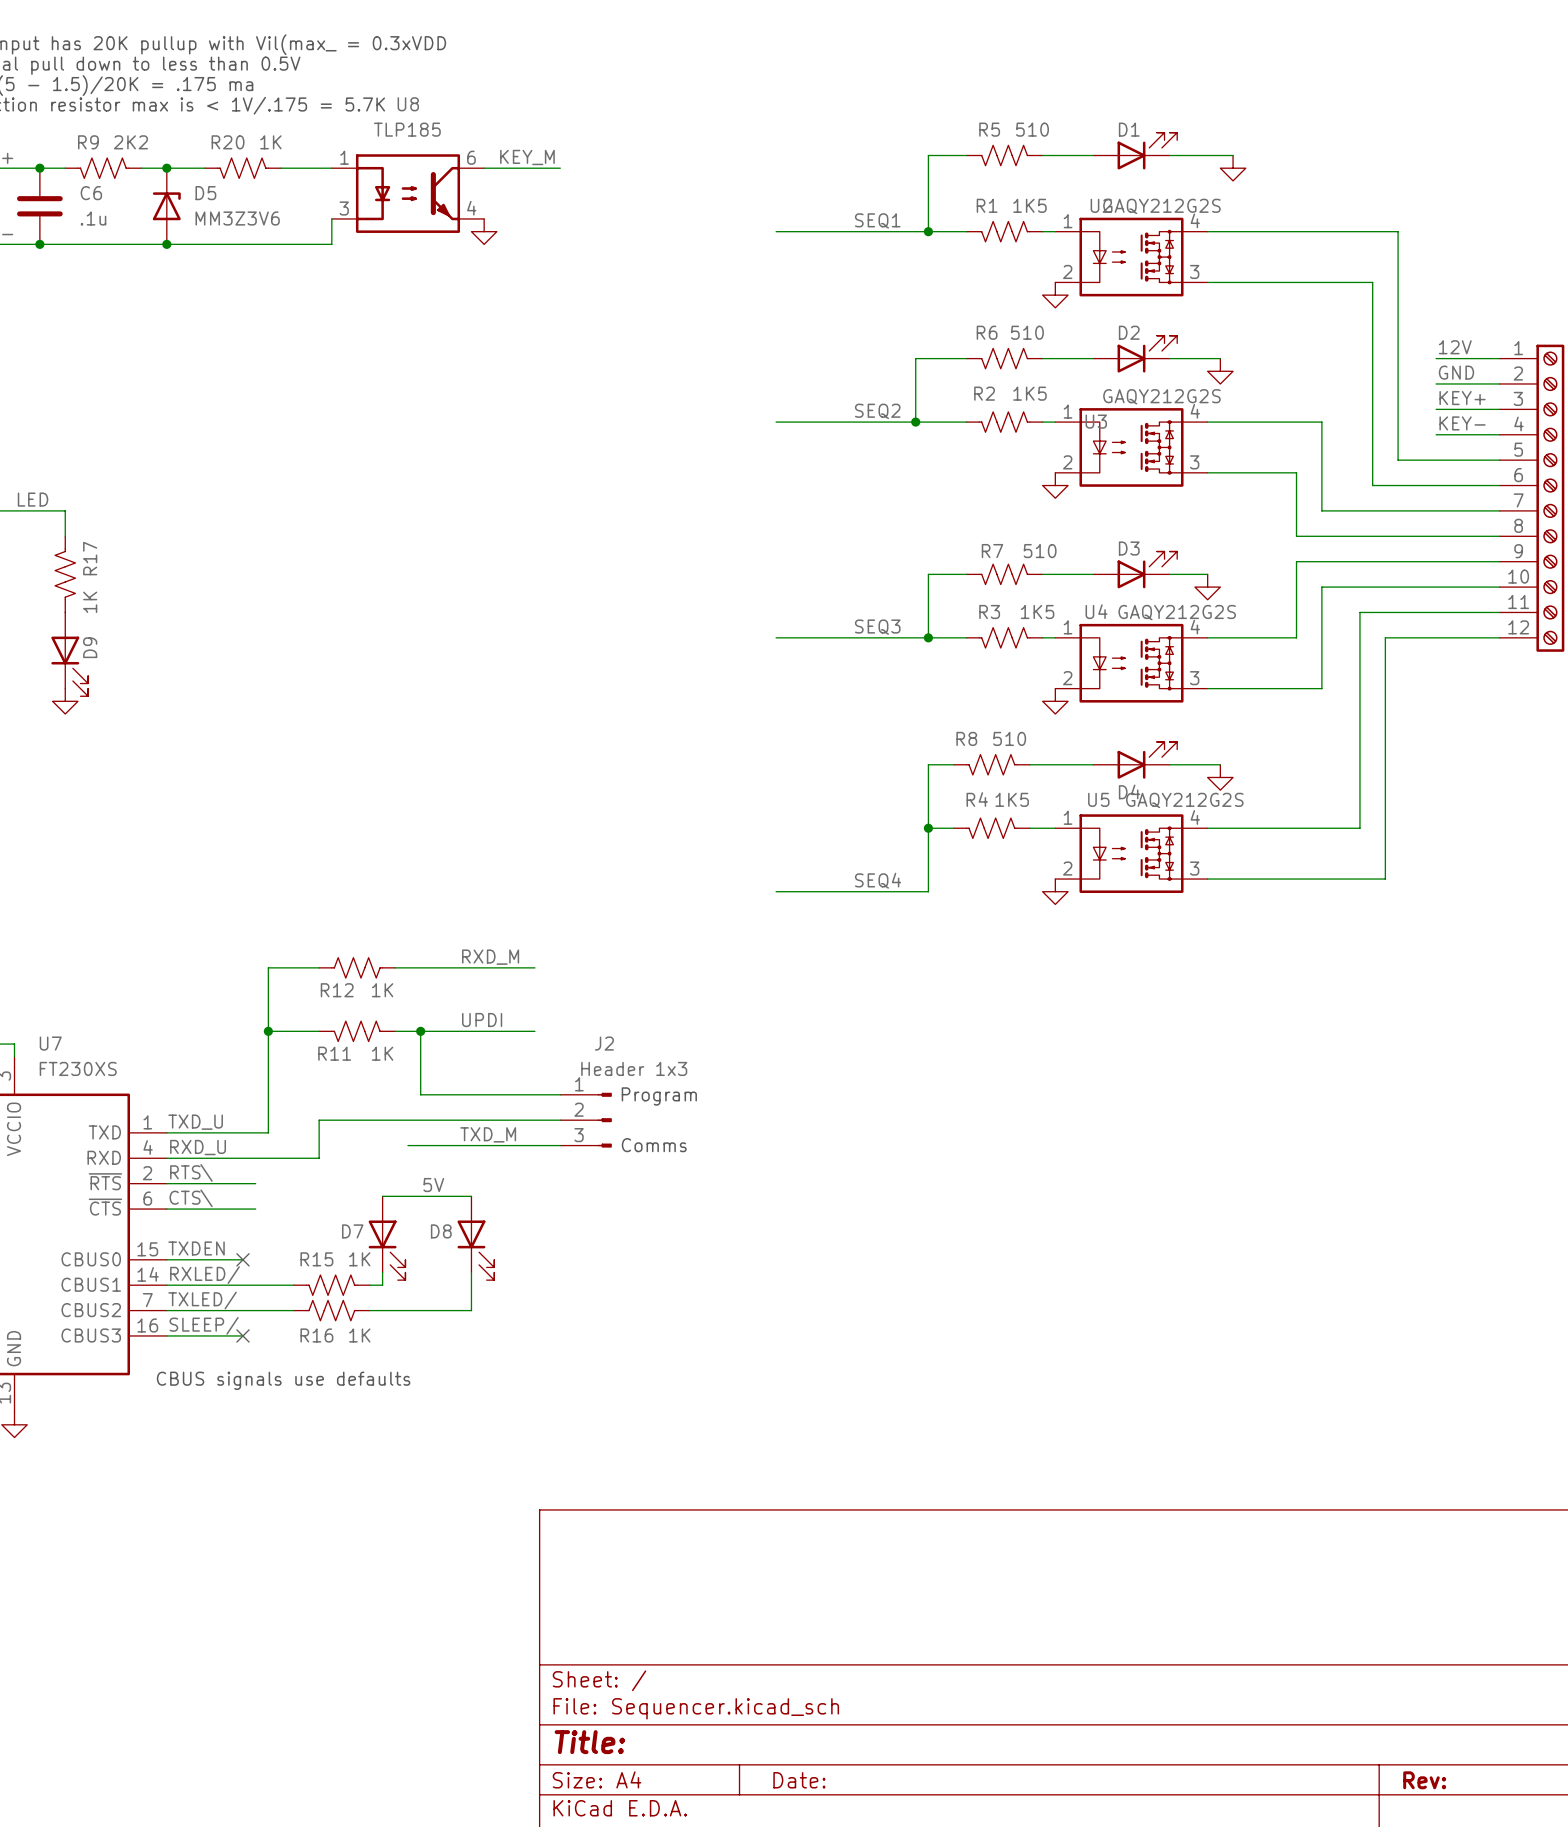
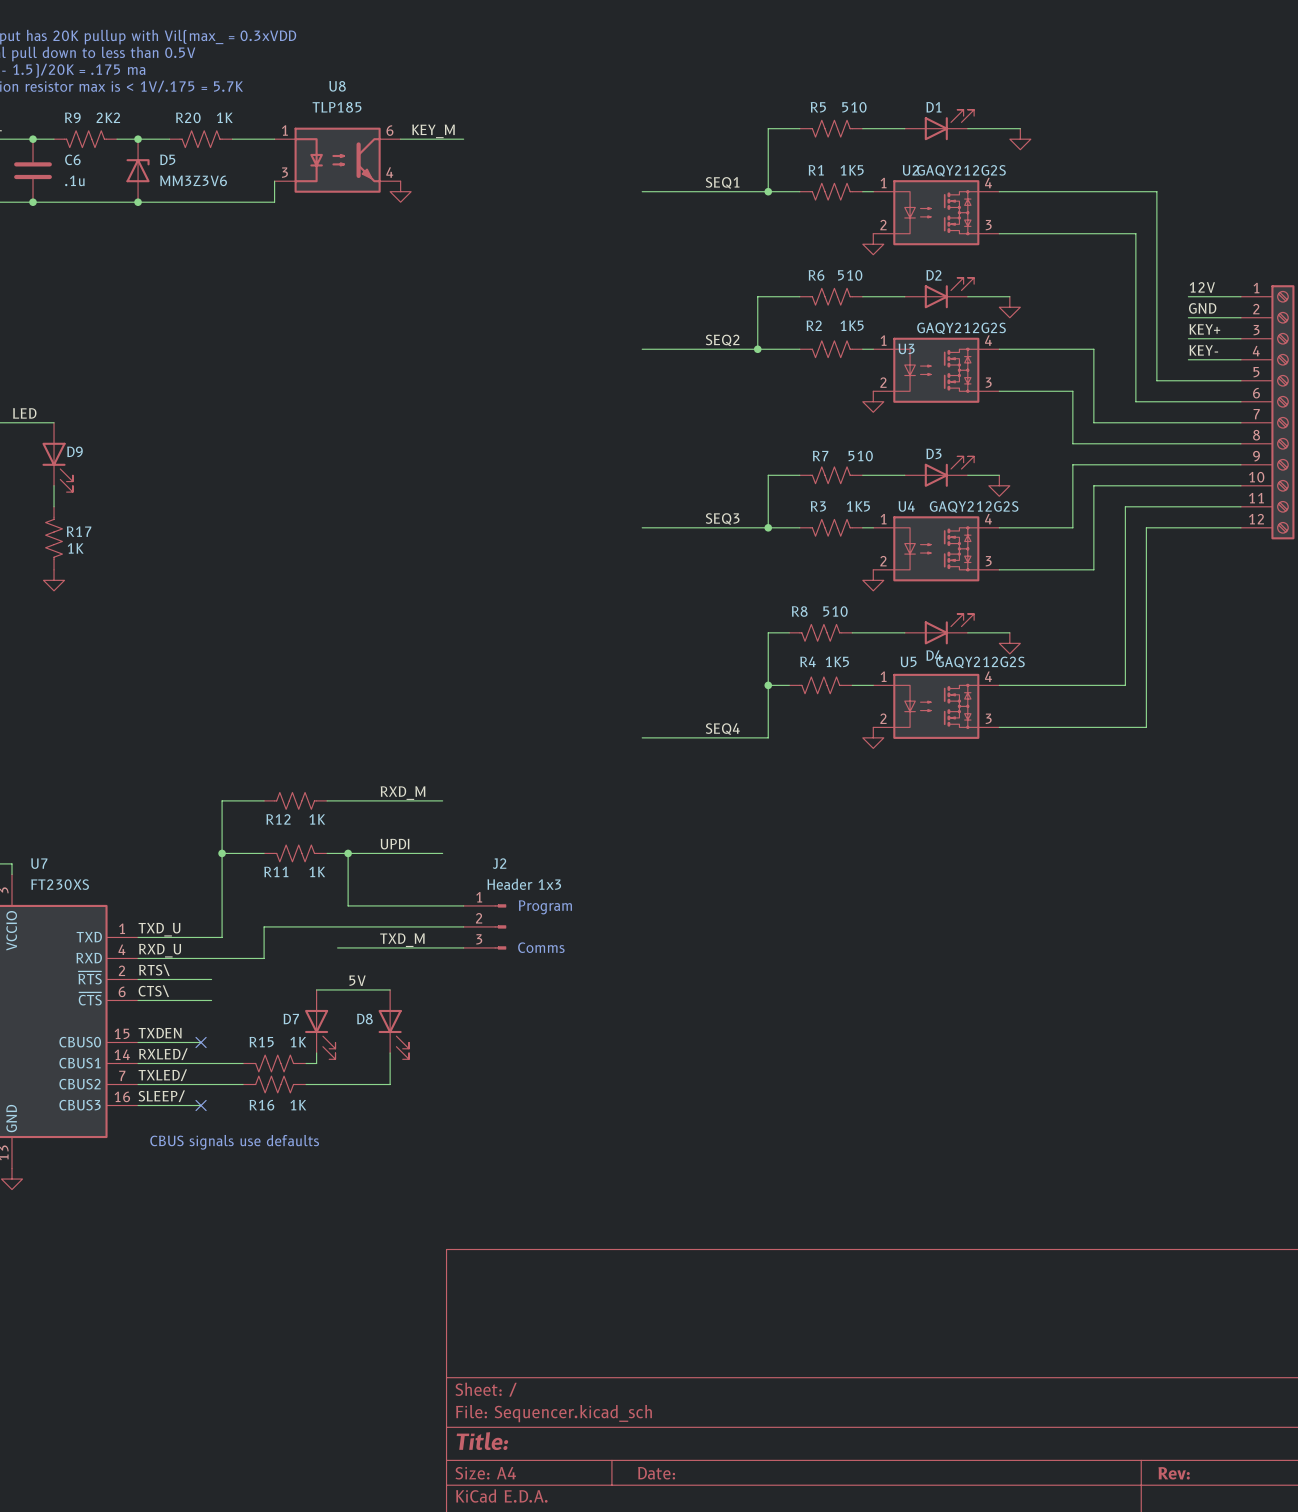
R17 name rotation: 0° (90, 558) -> 90° clockwise (79, 531)
R17 position: (65, 574) -> (54, 538)
R17 value rotation: 0° (90, 602) -> 90° clockwise (75, 548)
D9 name rotation: 0° (90, 647) -> 90° clockwise (74, 451)
D9 position: (69, 654) -> (57, 457)

